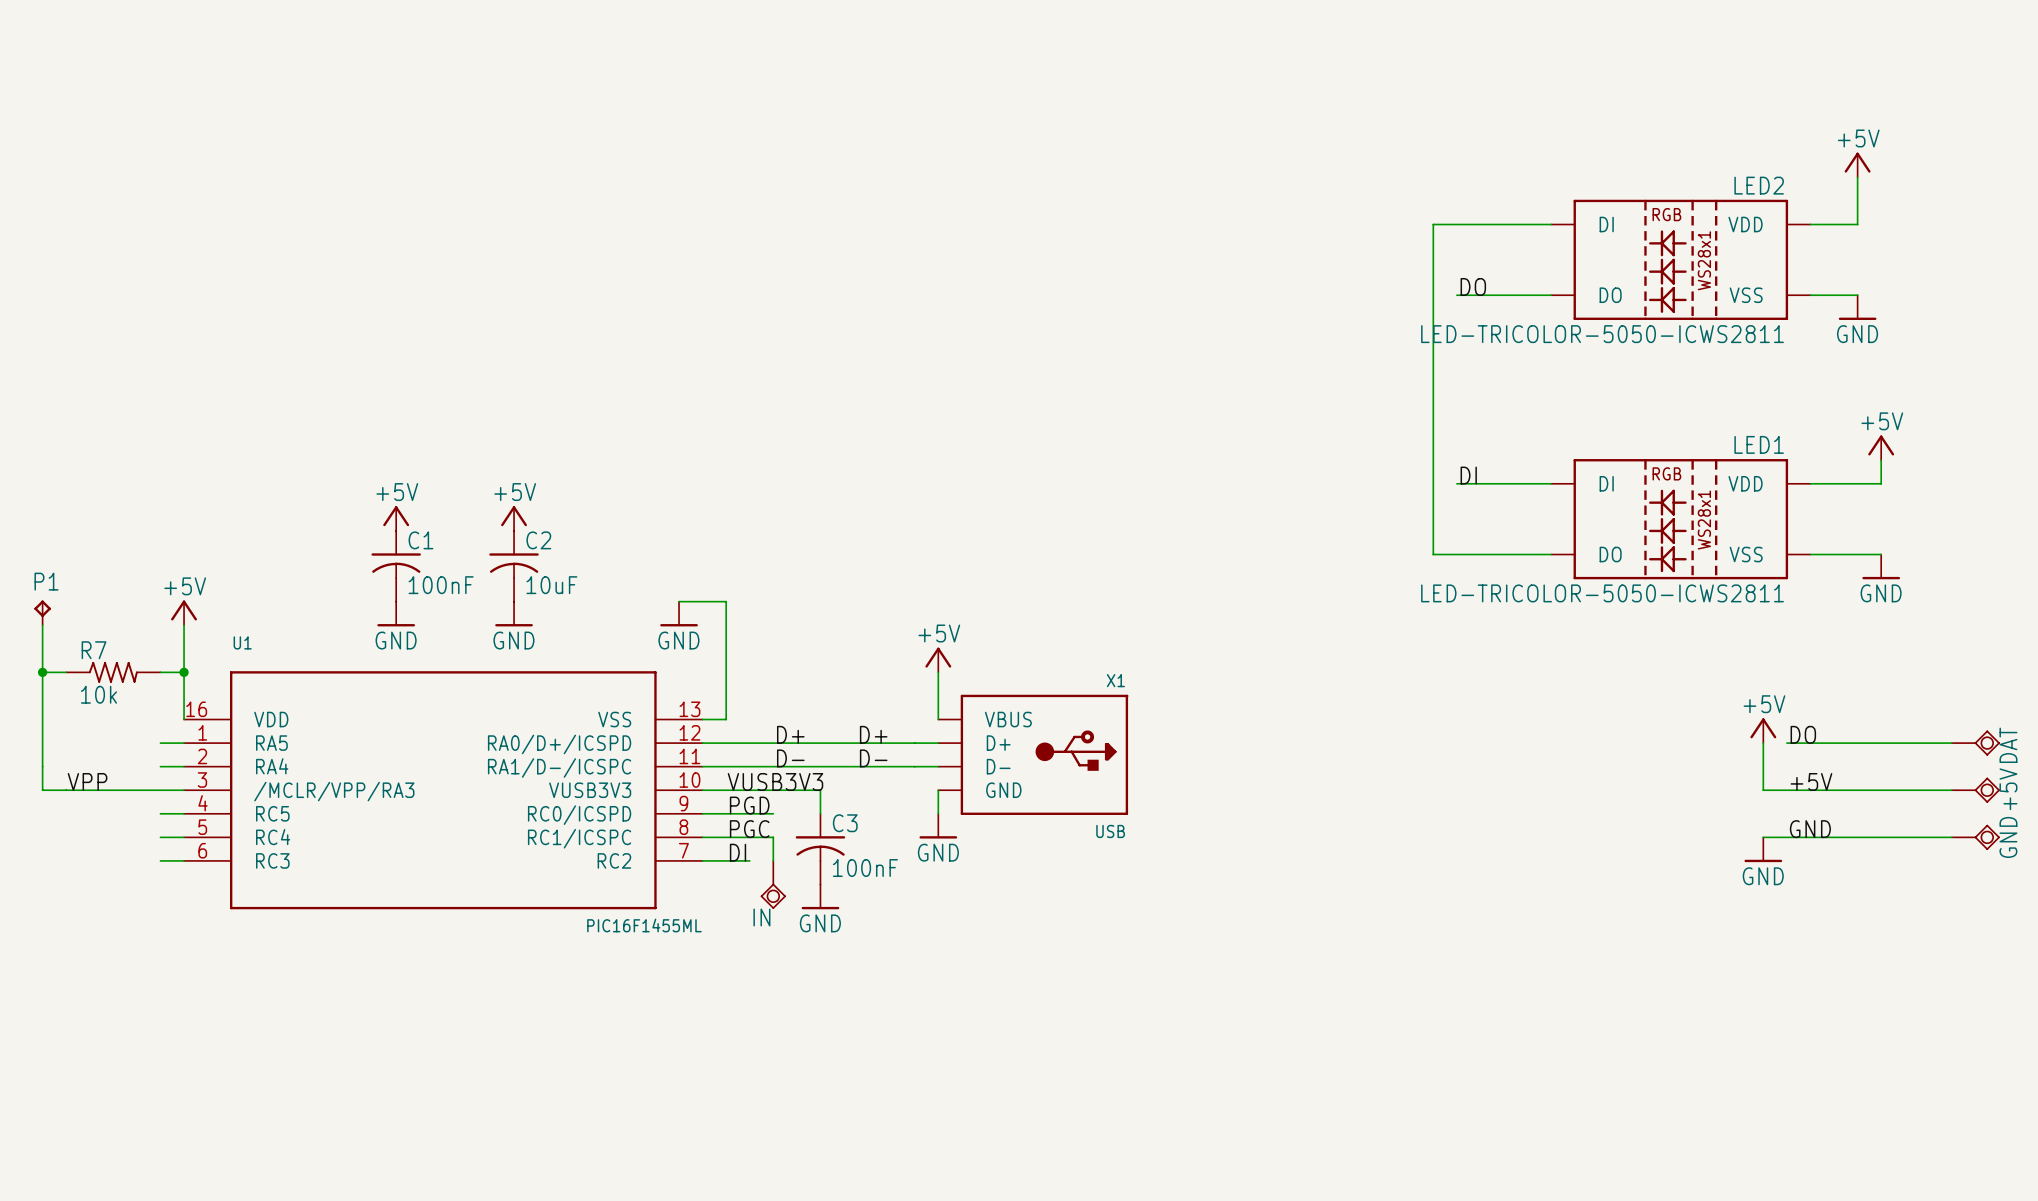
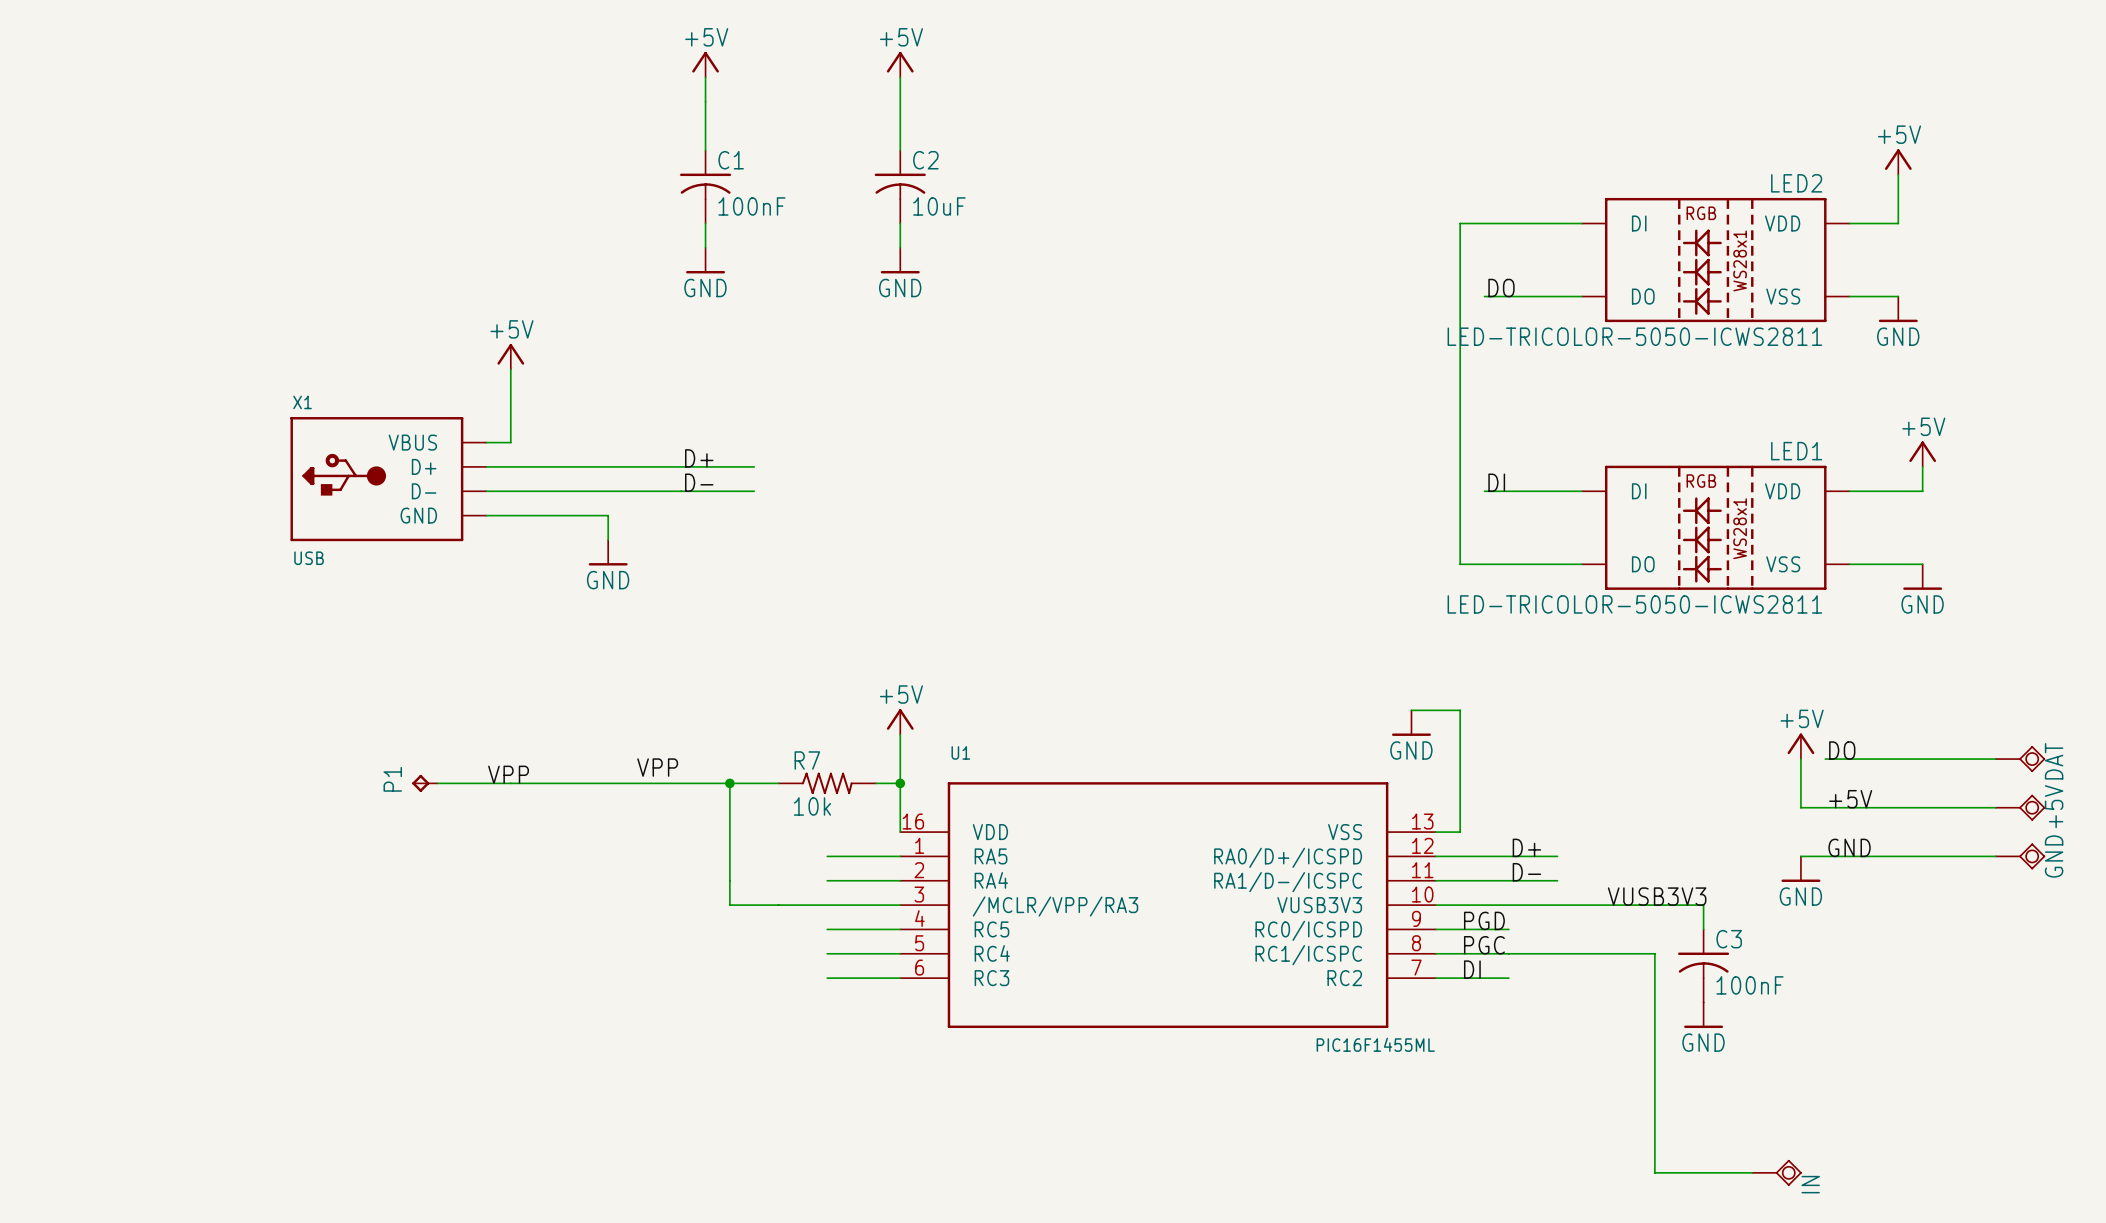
power symbol: none -> +5V (705, 64)
power symbol: none -> +5V (900, 64)
wire: none -> (705, 77) (705, 150)
wire: none -> (900, 77) (900, 150)
wire: none -> (705, 223) (705, 247)
wire: none -> (900, 223) (900, 247)
power symbol: none -> GND (705, 260)
power symbol: none -> GND (900, 260)
power symbol: none -> +5V (510, 356)
wire: none -> (510, 369) (510, 442) (486, 442)
label: none -> D+ (699, 458)
wire: none -> (486, 466) (754, 466)
label: none -> D- (699, 482)
wire: none -> (486, 491) (754, 491)
wire: none -> (486, 515) (608, 515) (608, 539)
power symbol: +5V (396, 518) -> none
power symbol: +5V (514, 518) -> none
power symbol: none -> GND (608, 552)
C1 position: (396, 566) -> (705, 187)
C2 position: (514, 566) -> (900, 187)
wire: (679, 601) (726, 601) (726, 719) (702, 719) -> none
P1 rotation: 0° (42, 608) -> 90° counterclockwise (420, 783)
P1 position: (42, 612) -> (425, 783)
power symbol: +5V (184, 612) -> none
power symbol: GND (396, 614) -> none
power symbol: GND (514, 614) -> none
power symbol: GND (679, 614) -> none
wire: (42, 625) (42, 790) (184, 790) -> none
wire: (184, 625) (184, 719) -> none
power symbol text position: +5V (939, 633) -> +5V (901, 694)
power symbol position: +5V (938, 659) -> +5V (900, 721)
wire: (42, 672) (66, 672) -> none
junction: (42, 672) -> none
R7 position: (113, 672) -> (827, 783)
wire: (160, 672) (184, 672) -> none
junction: (184, 672) -> none
wire: (938, 672) (938, 719) -> none
wire: none -> (1411, 710) (1460, 710) (1460, 832) (1435, 832)
power symbol: none -> GND (1411, 723)
wire: none -> (900, 734) (900, 832)
label: D+ (790, 734) -> none
label: D+ (873, 734) -> none
wire: (160, 743) (184, 743) -> none
wire: (702, 743) (938, 743) -> none
label: none -> VPP (657, 767)
X1 position: (1033, 754) -> (388, 479)
X1 flip: as is (1044, 754) -> left-right (376, 479)
label: none -> VPP (508, 774)
label: D- (790, 758) -> none
label: D- (873, 758) -> none
wire: (160, 766) (184, 766) -> none
wire: none -> (437, 783) (705, 783)
wire: none -> (729, 783) (729, 905) (900, 905)
junction: none -> (729, 783)
wire: (891, 766) (938, 766) -> none
junction: none -> (900, 783)
label: VPP (87, 781) -> none
label: VUSB3V3 (775, 781) -> none
U1 position: (443, 790) -> (1168, 905)
wire: (702, 790) (820, 790) (820, 813) -> none
label: PGD (749, 805) -> none
wire: (160, 813) (184, 813) -> none
wire: (702, 813) (773, 813) -> (827, 856) (900, 856)
power symbol: GND (938, 826) -> none
label: PGC (749, 829) -> none
label: none -> D+ (1526, 847)
wire: (160, 837) (184, 837) -> none
wire: (702, 837) (773, 837) (773, 860) -> none
wire: none -> (1435, 856) (1557, 856)
C3 position: (820, 849) -> (1703, 965)
label: DI (738, 852) -> none
label: none -> D- (1526, 872)
wire: (160, 860) (184, 860) -> none
wire: (702, 860) (749, 860) -> none
wire: none -> (827, 880) (900, 880)
wire: none -> (1435, 880) (1557, 880)
label: none -> VUSB3V3 (1657, 896)
IN: (773, 884) -> none
wire: none -> (1435, 905) (1703, 905) (1703, 929)
power symbol: GND (820, 896) -> none
label: none -> PGD (1484, 920)
wire: none -> (827, 929) (900, 929)
wire: none -> (1435, 929) (1508, 929)
label: none -> PGC (1484, 945)
wire: none -> (827, 953) (900, 953)
wire: none -> (1435, 953) (1654, 953) (1654, 1172) (1752, 1172)
label: none -> DI (1472, 969)
wire: none -> (827, 978) (900, 978)
wire: none -> (1435, 978) (1508, 978)
power symbol: none -> GND (1703, 1015)
IN: none -> (1776, 1172)

